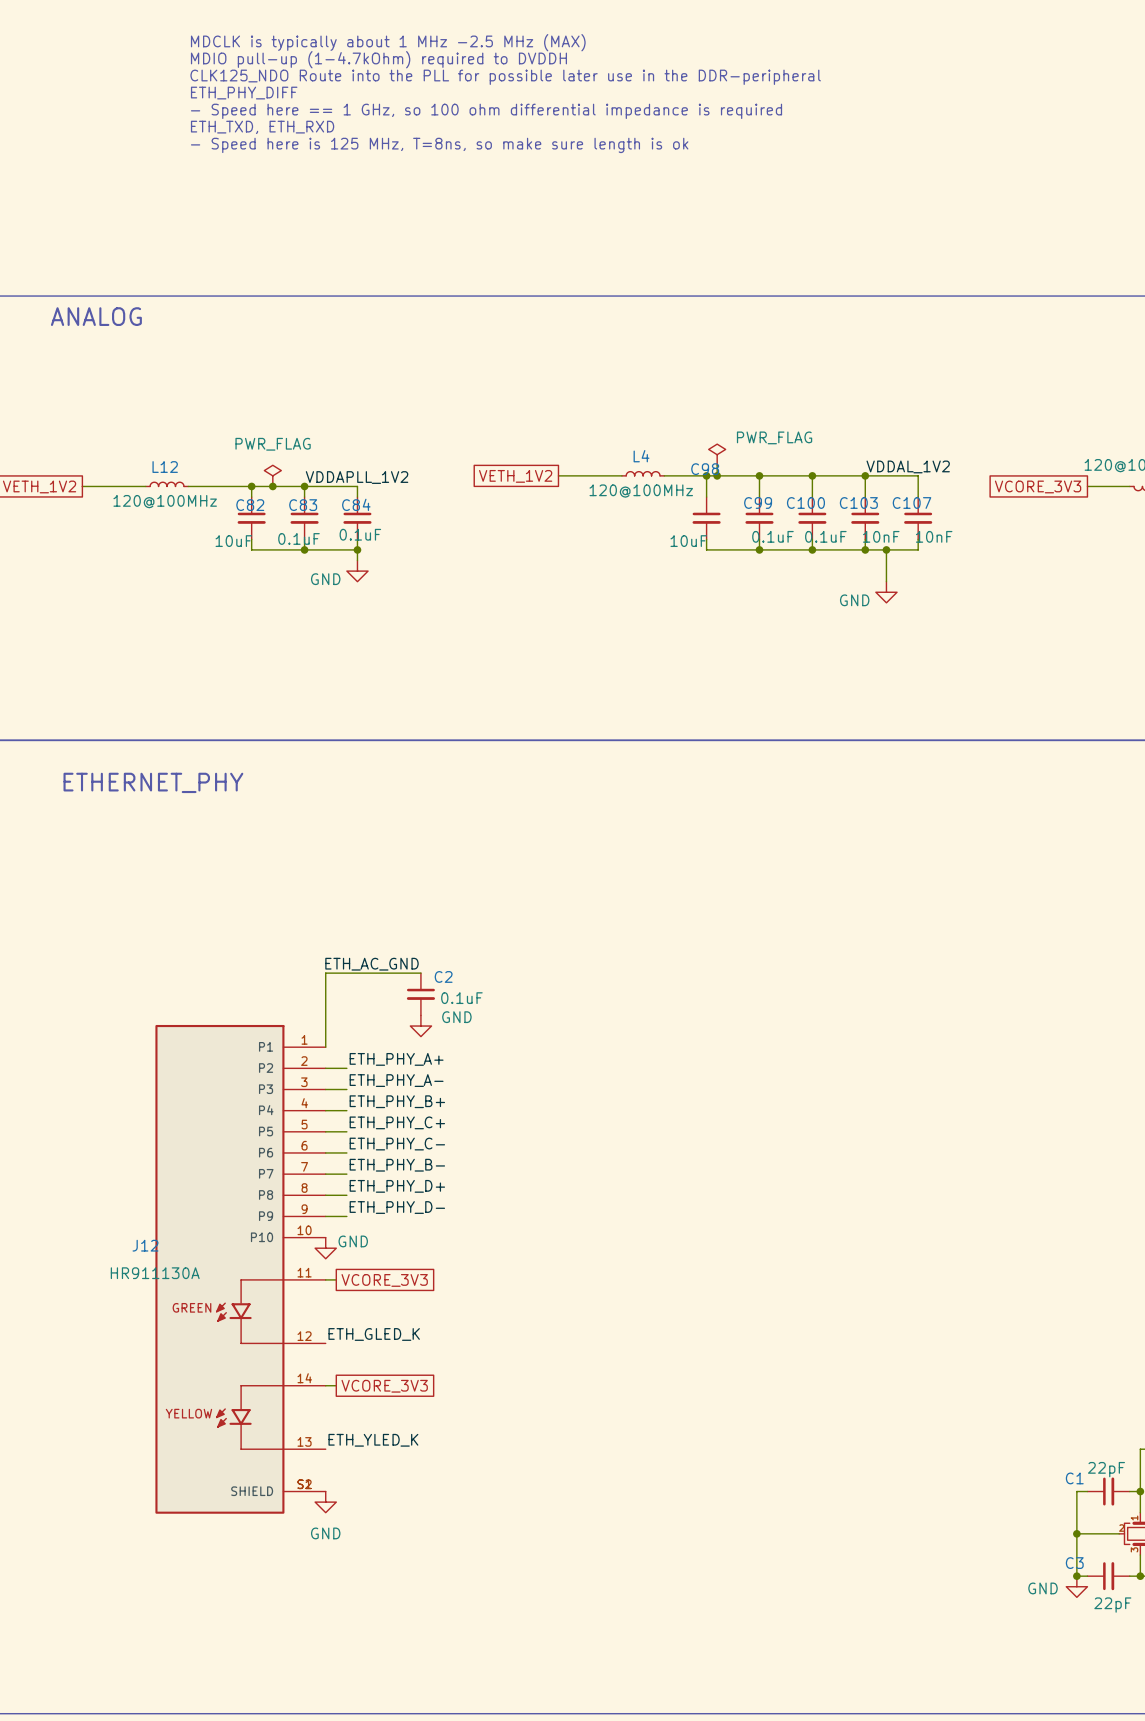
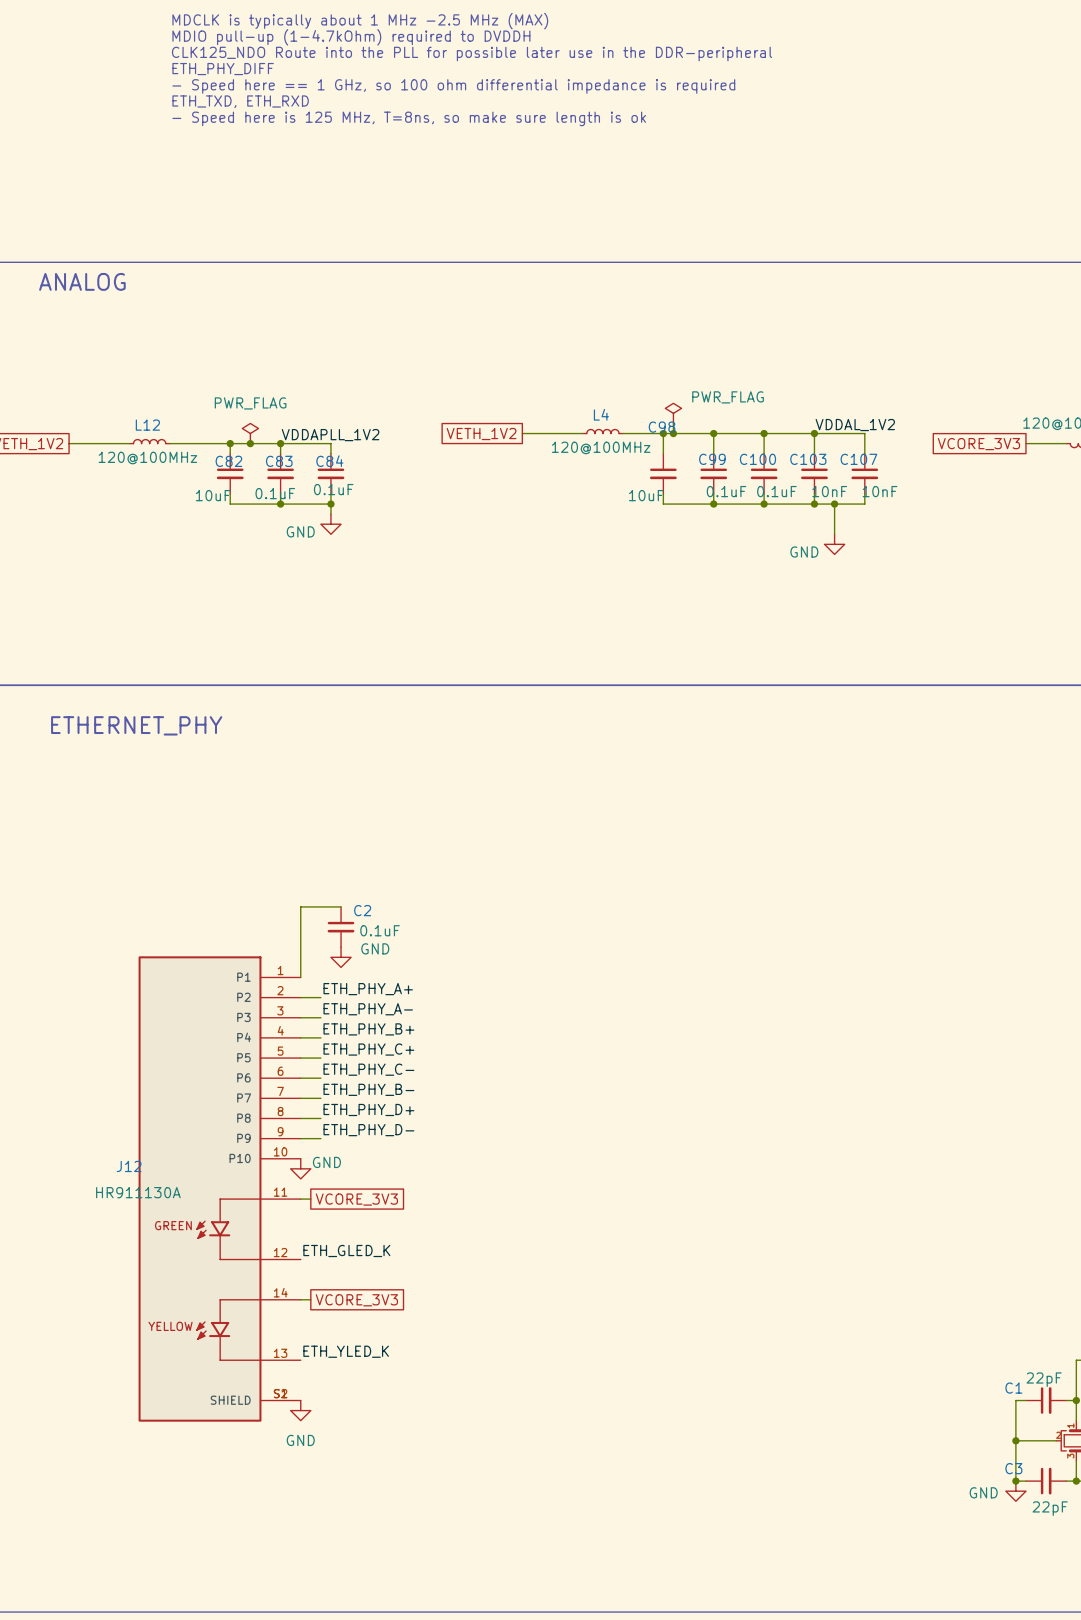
label: ETH_AC_GND (371, 964) -> none
wire: (368, 973) (420, 973) -> none
C2 position: (420, 994) -> (341, 927)
power symbol position: GND (420, 1026) -> GND (341, 957)

